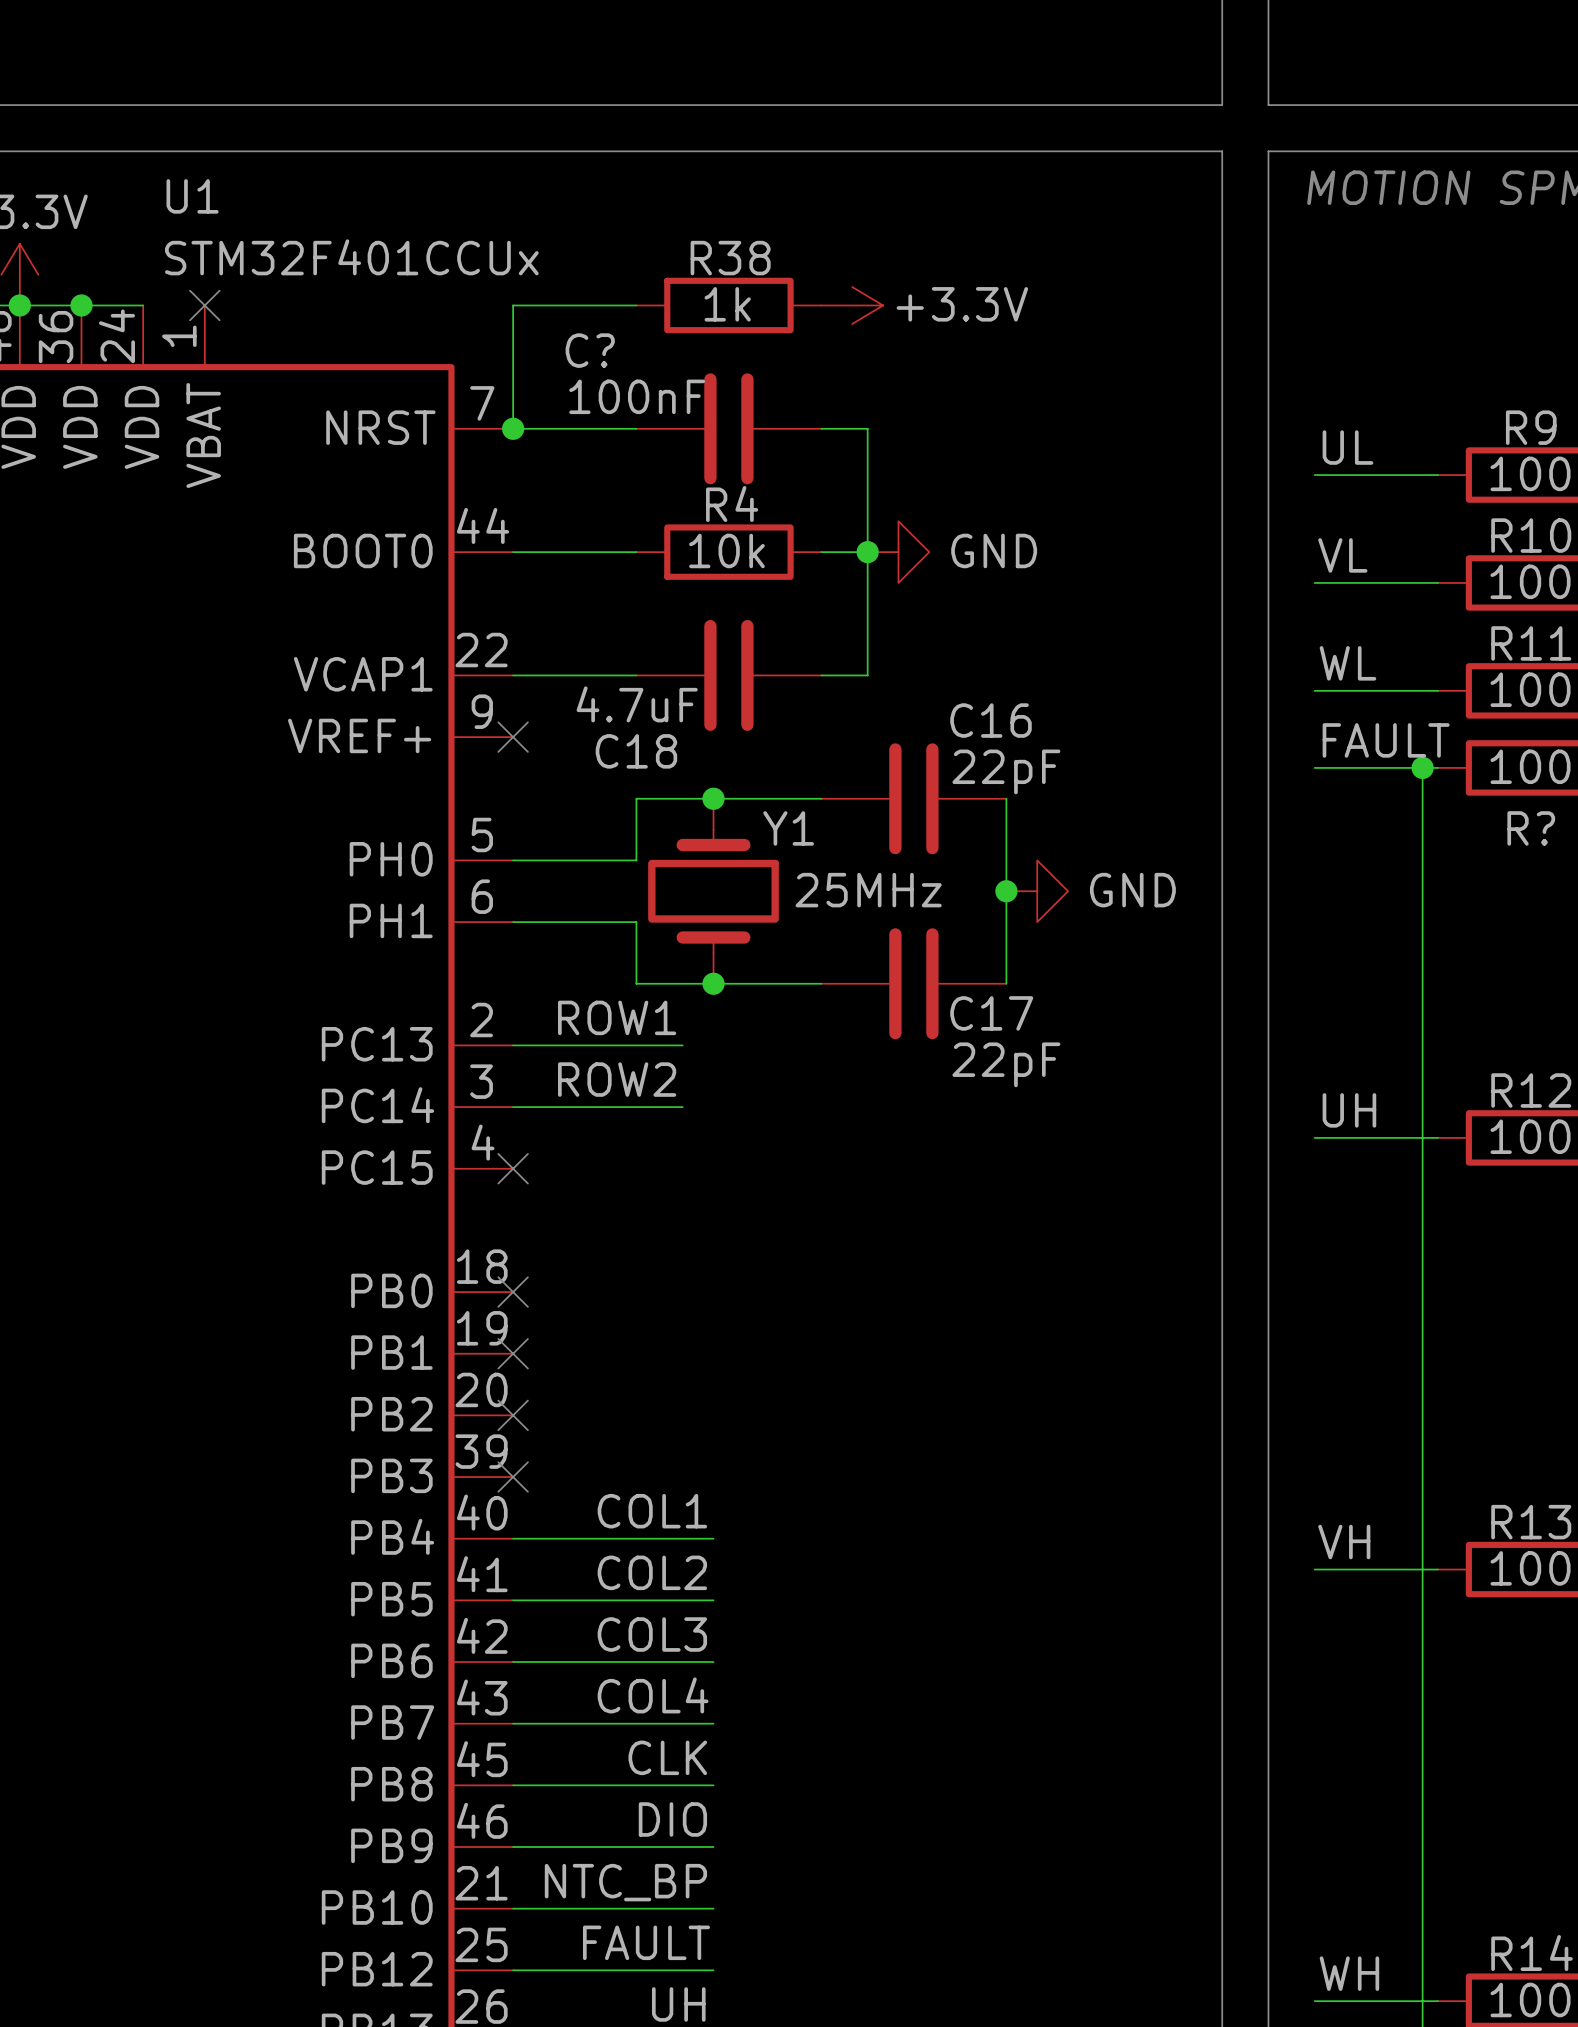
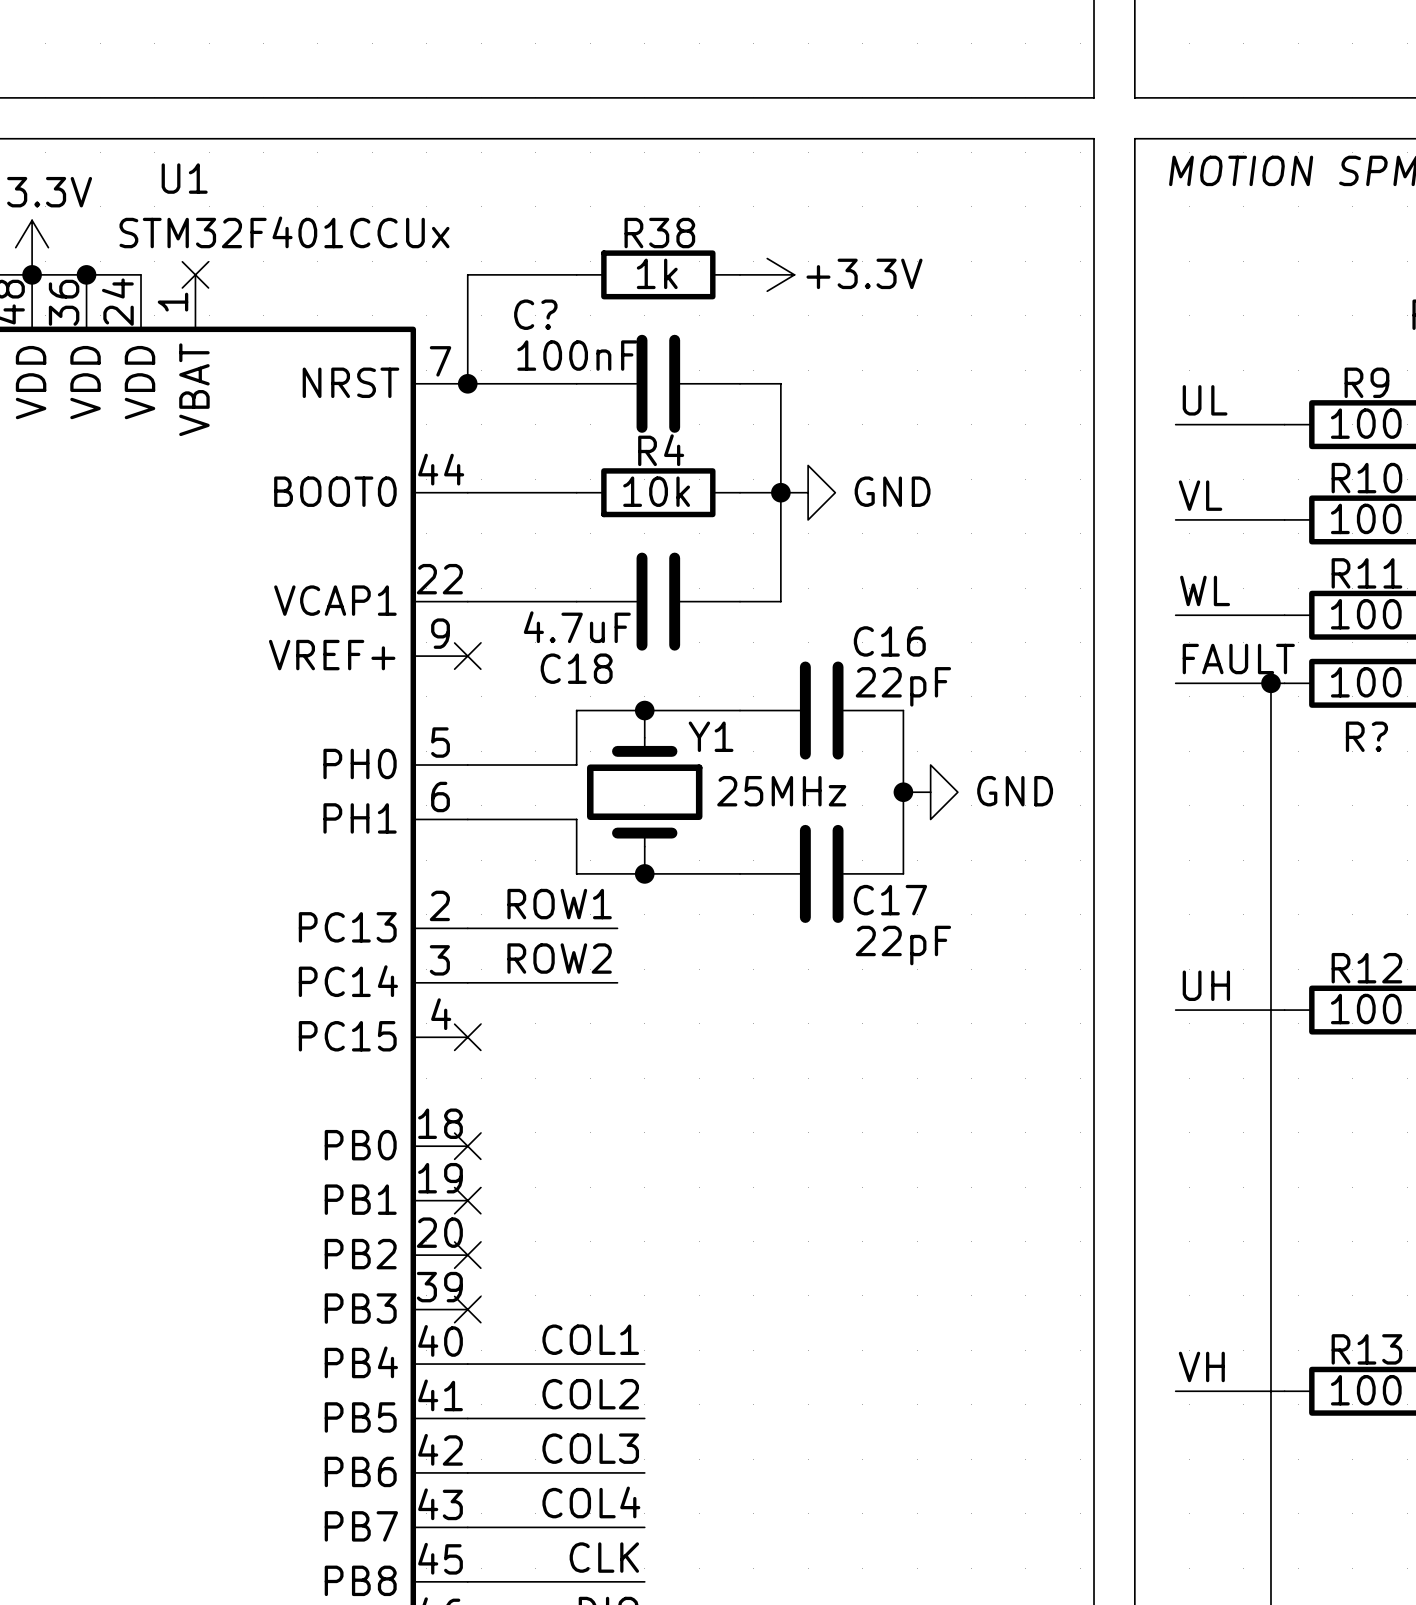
U1 value position: STM32F401CCUx (351, 257) -> STM32F401CCUx (284, 232)

